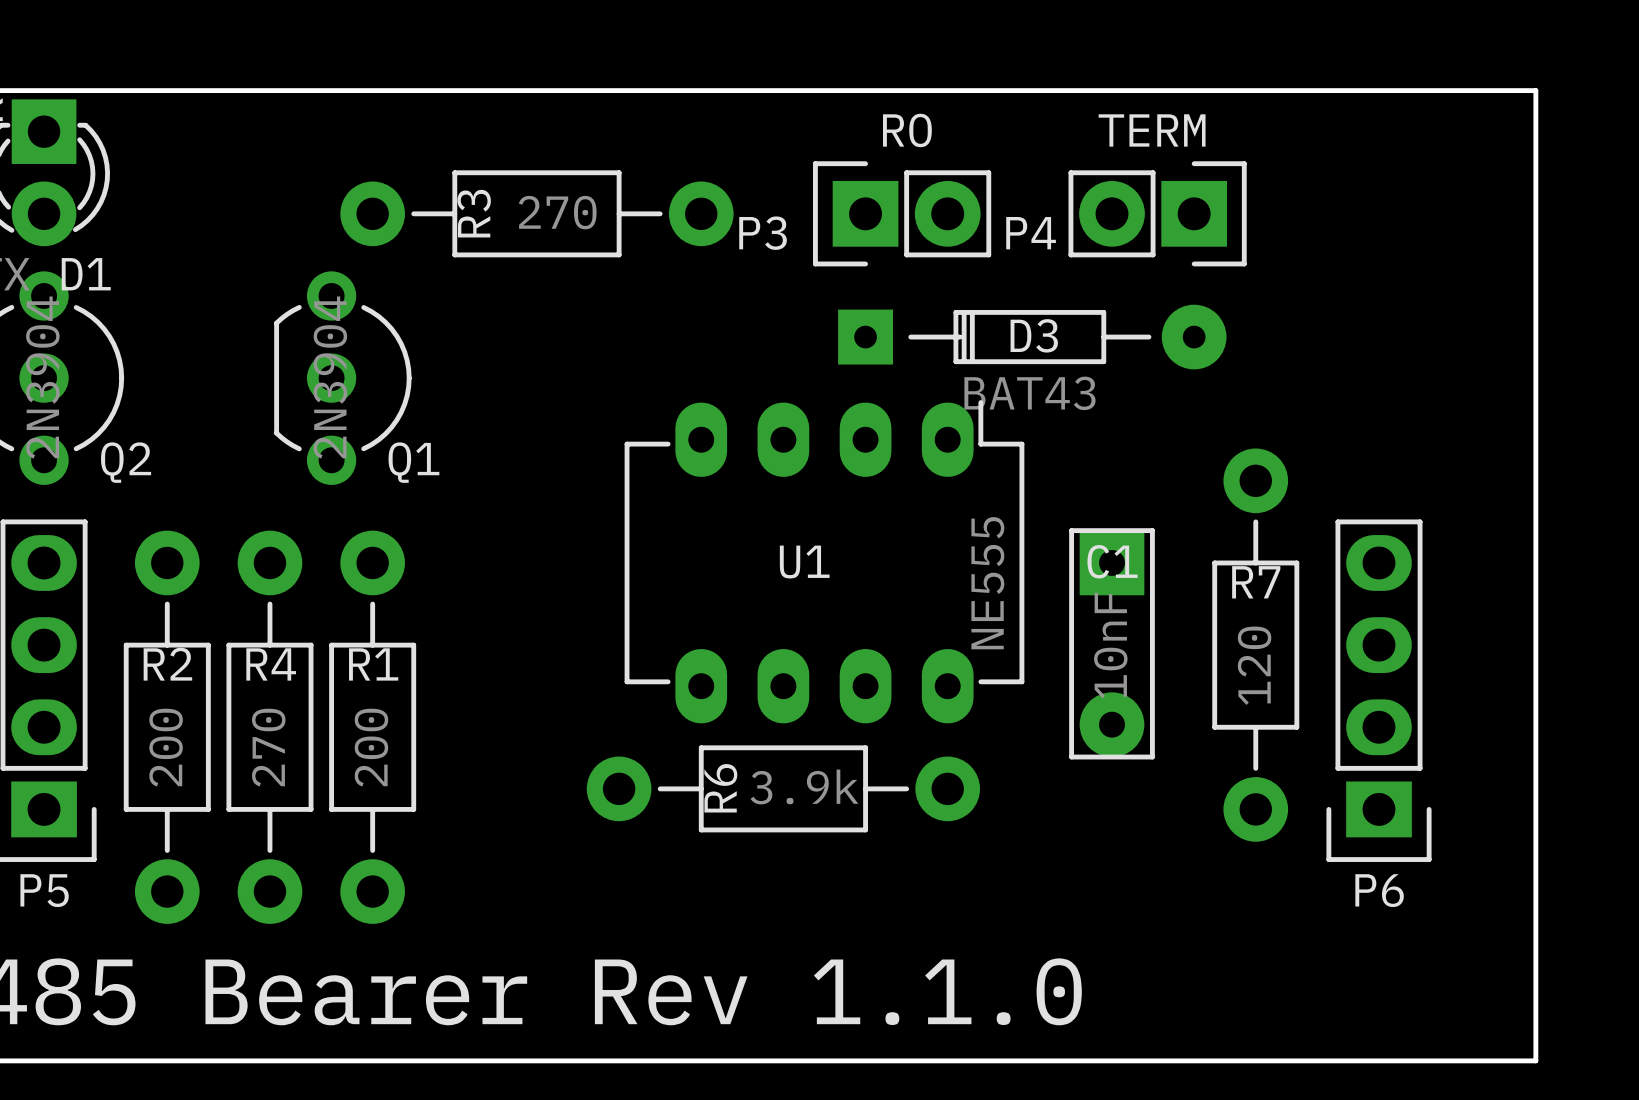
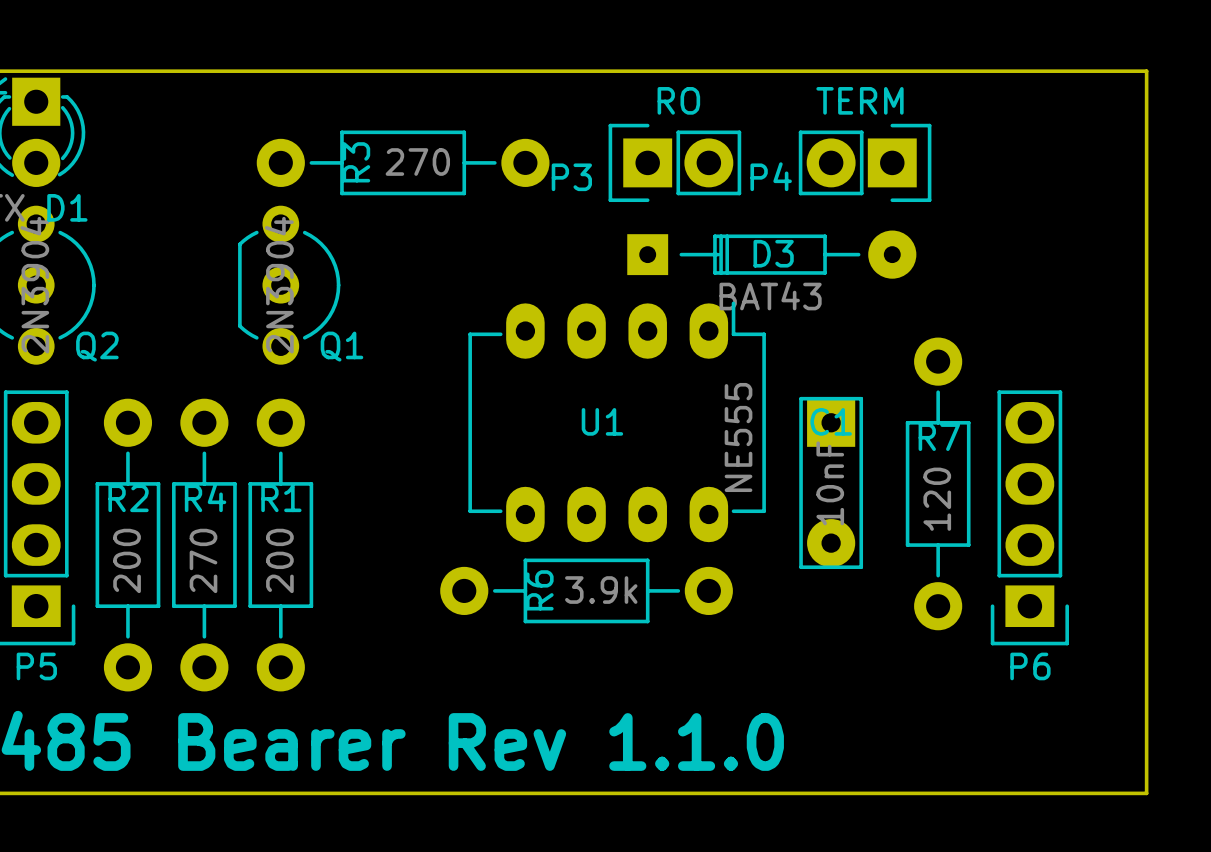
Q1 position: (342, 378) -> (289, 285)

